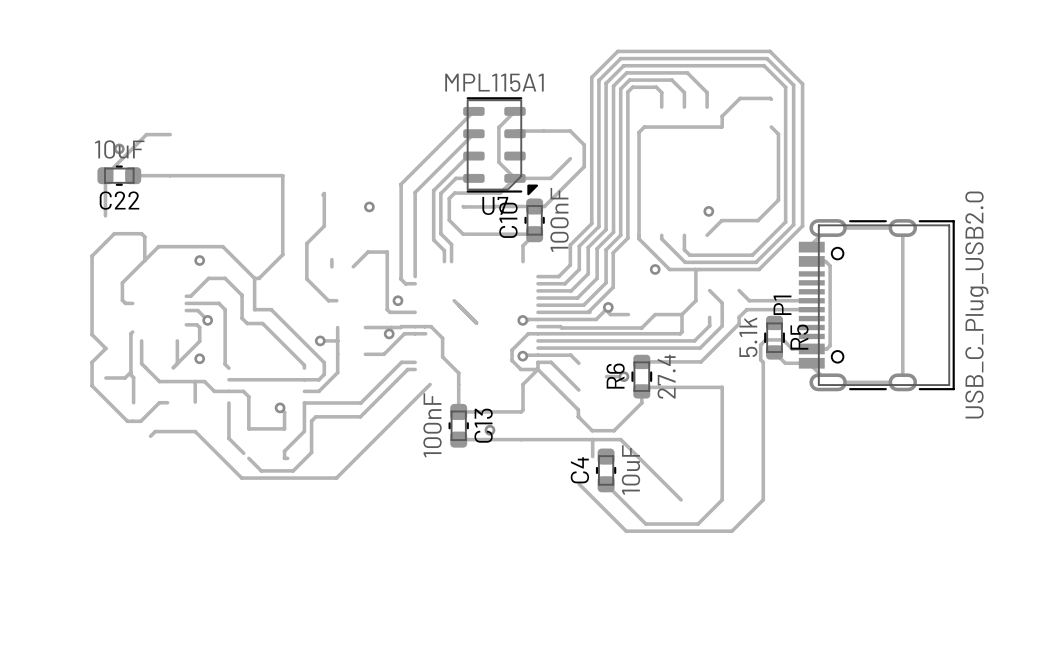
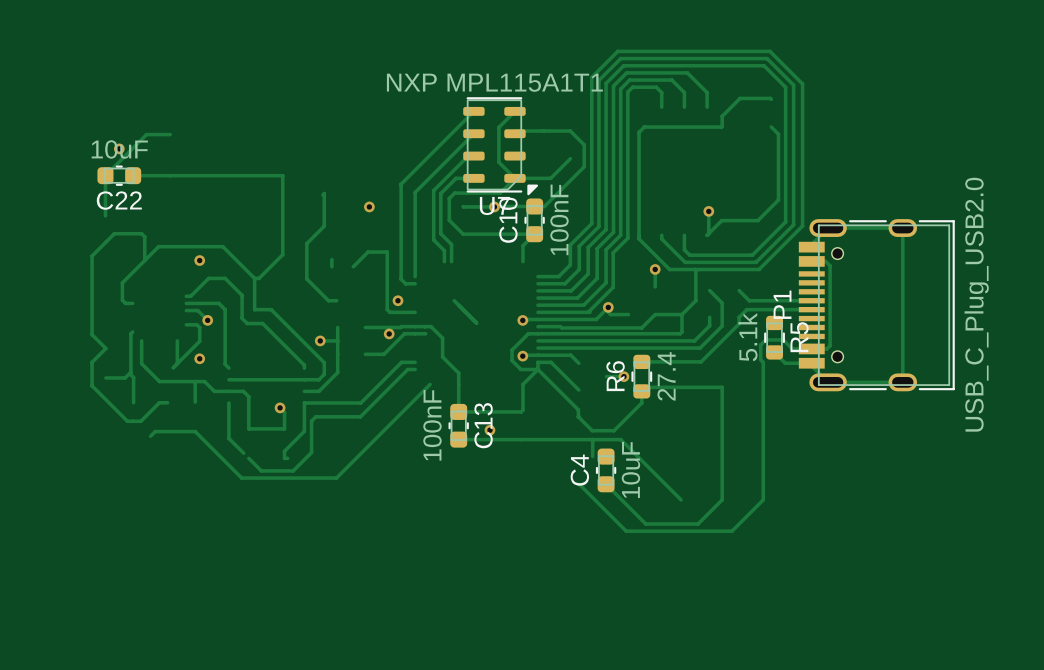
U7 value: MPL115A1 (494, 82) -> NXP MPL115A1T1 (494, 82)
via: none -> (494, 206)
track: none -> (708, 211) (708, 233)
track: none -> (655, 269) (655, 286)

